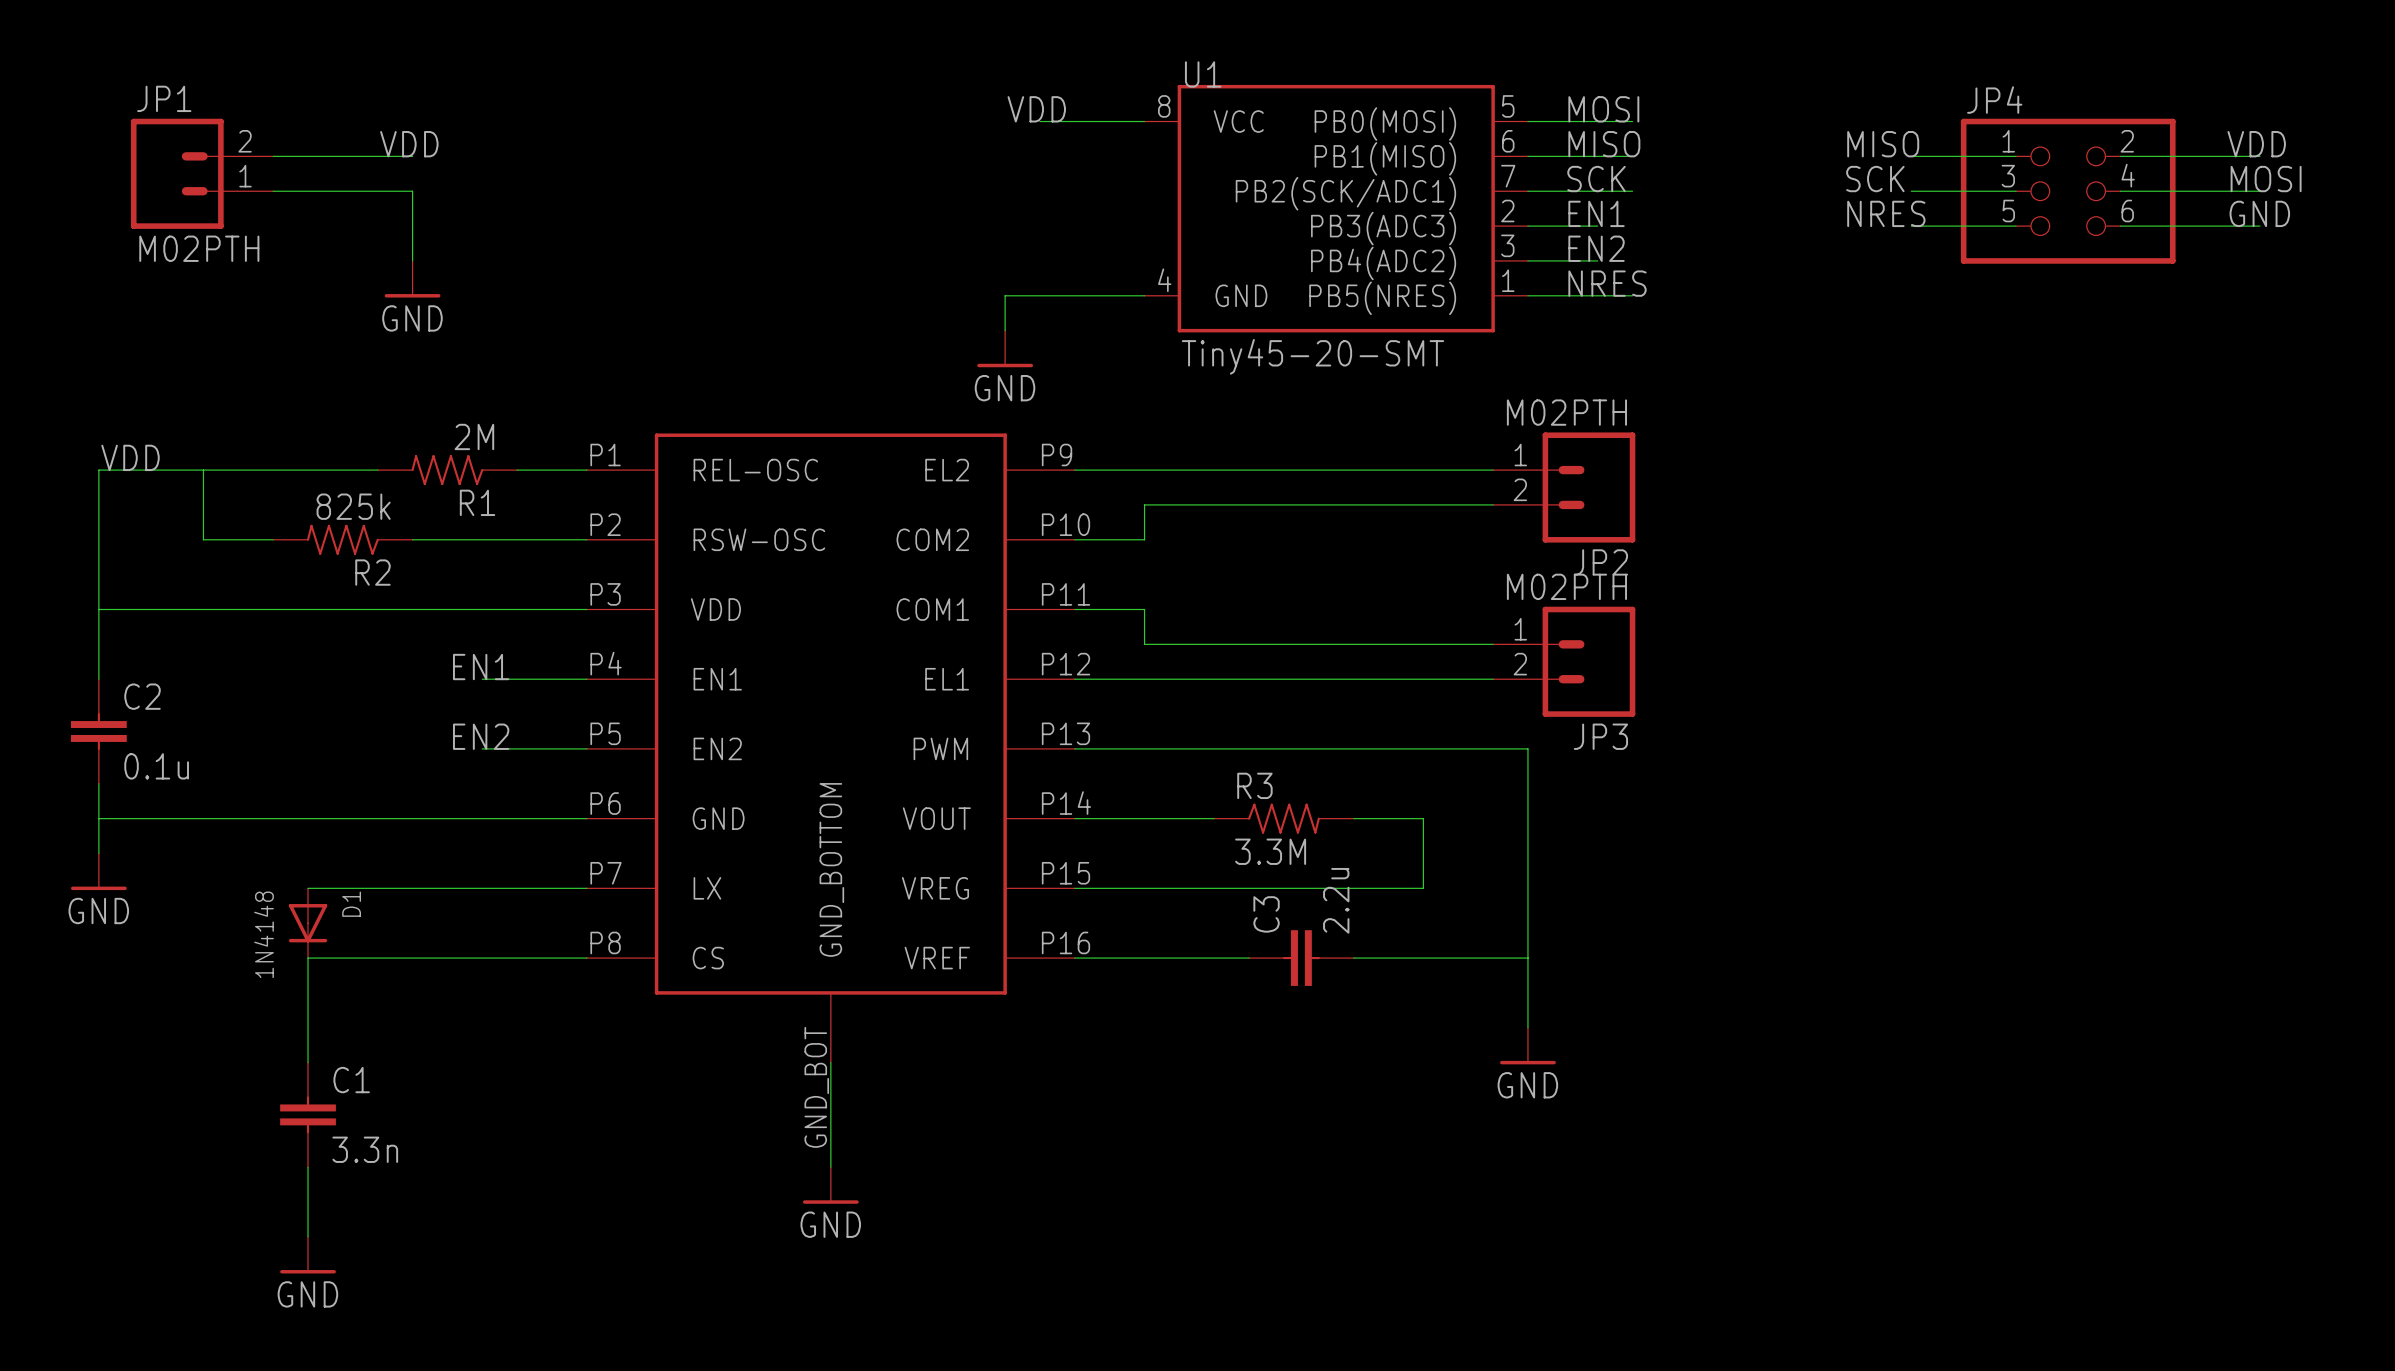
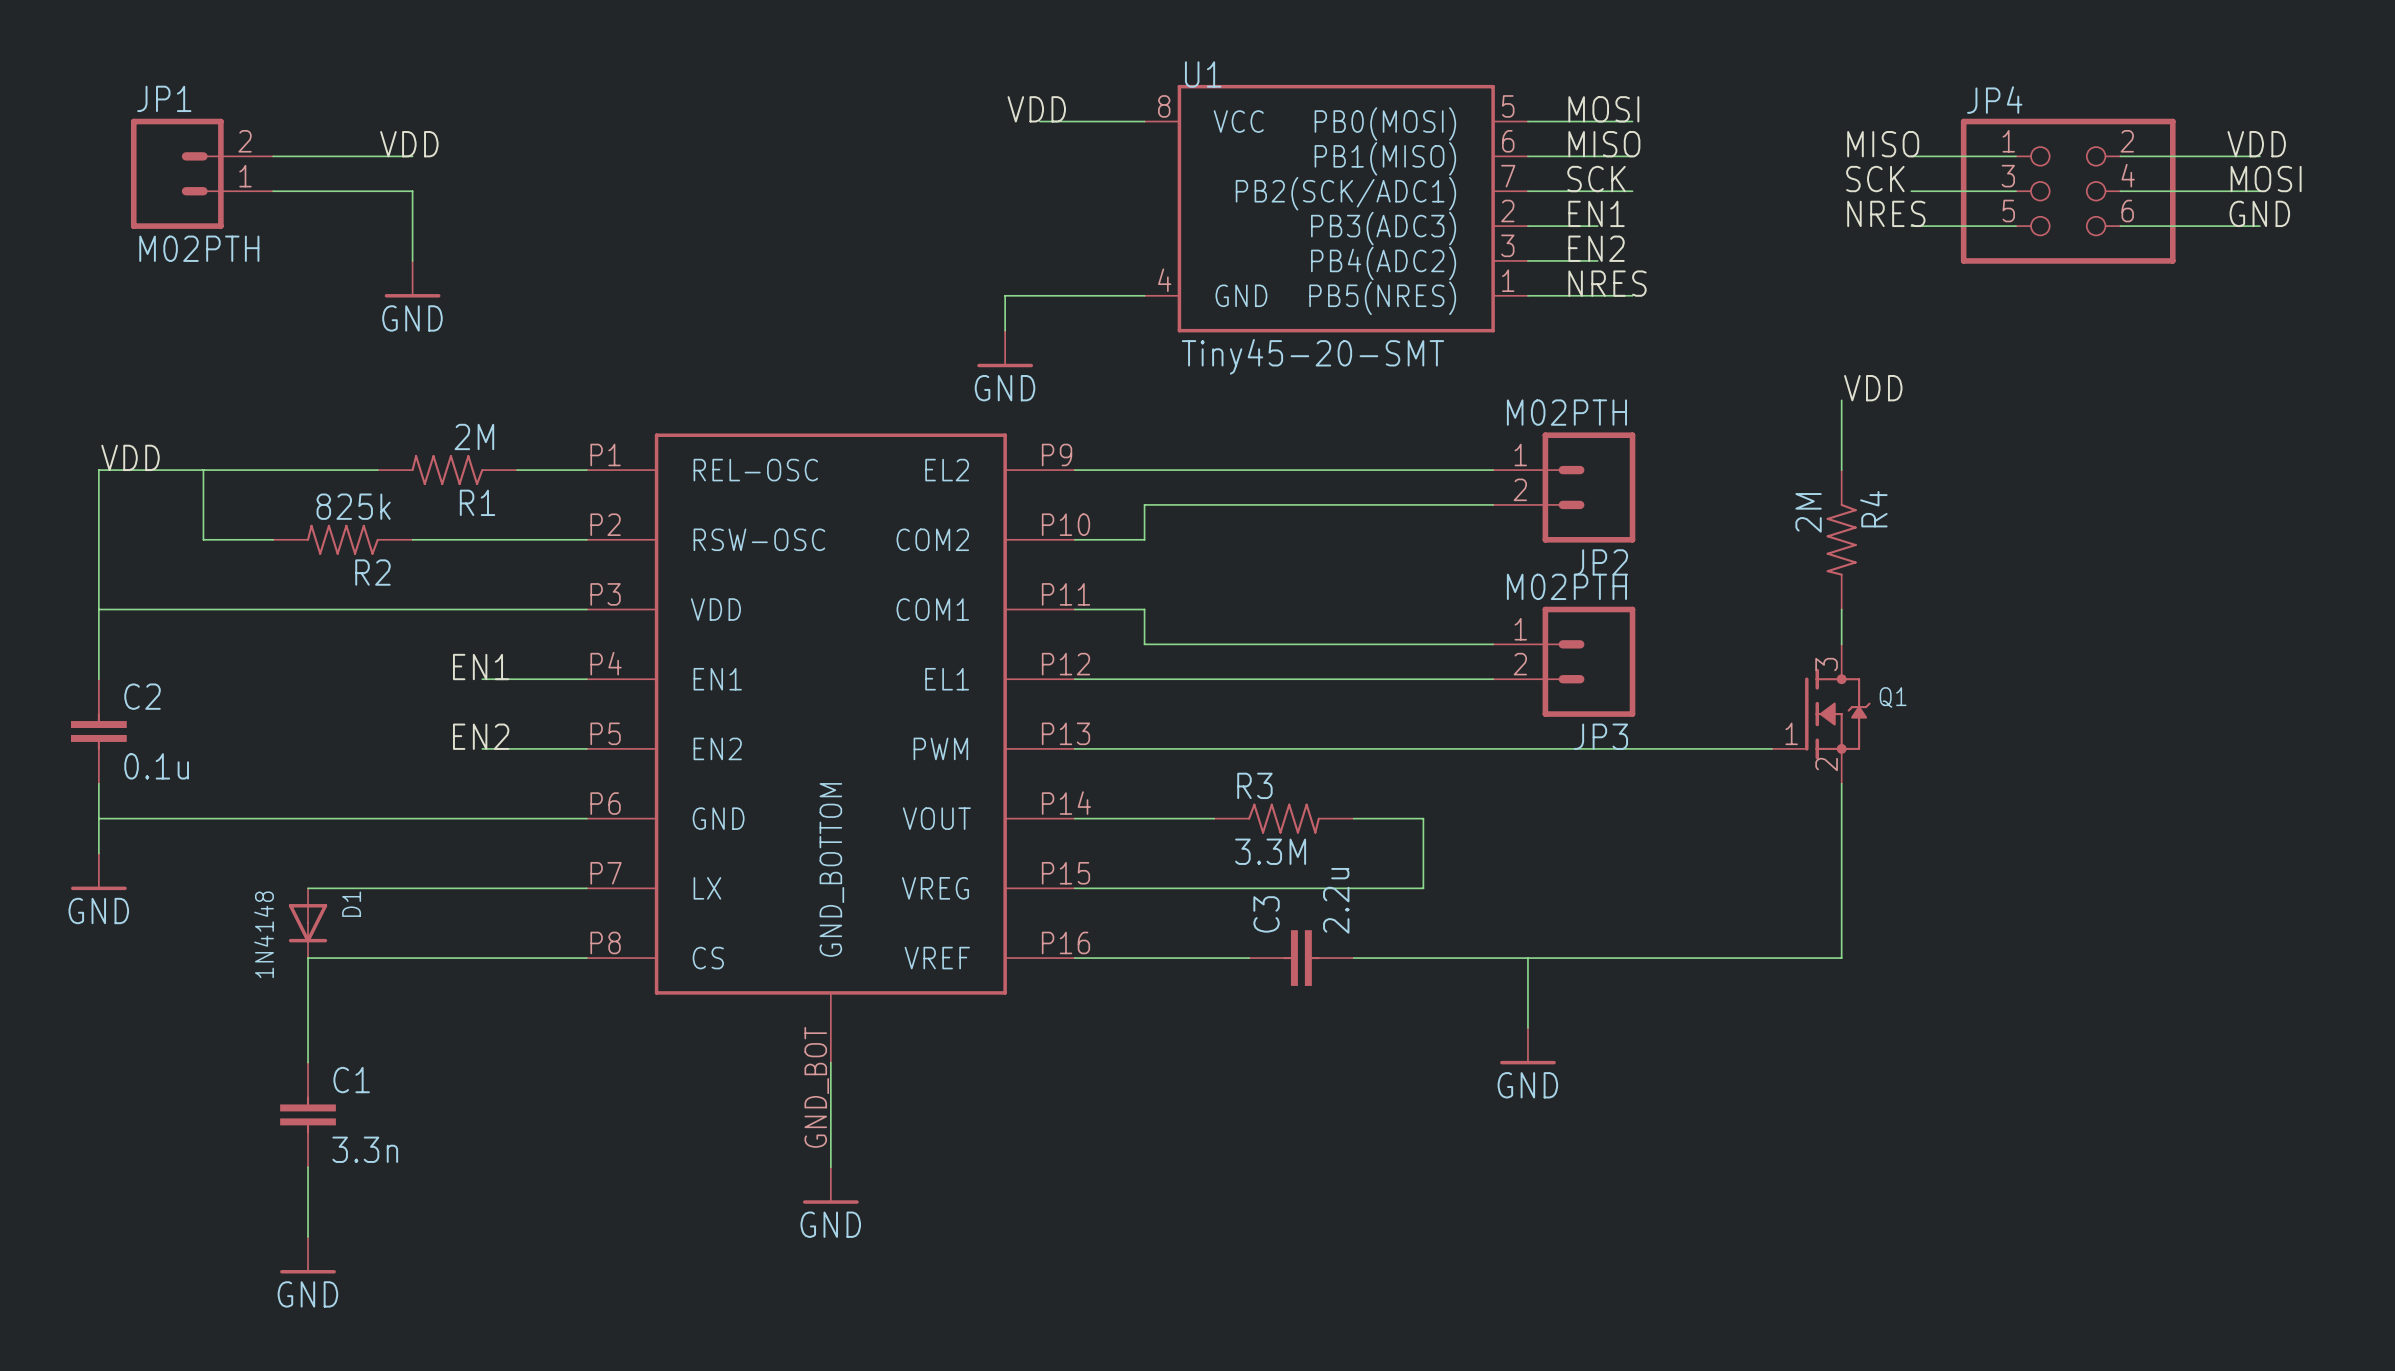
label: none -> VDD (1873, 388)
wire: none -> (1841, 400) (1841, 470)
R4: none -> 2M (1841, 539)
wire: none -> (1841, 609) (1841, 644)
Q1: none -> (1821, 714)
wire: (1527, 748) (1527, 958) -> (1841, 783) (1841, 958) (1527, 958)
wire: none -> (1527, 748) (1771, 748)

